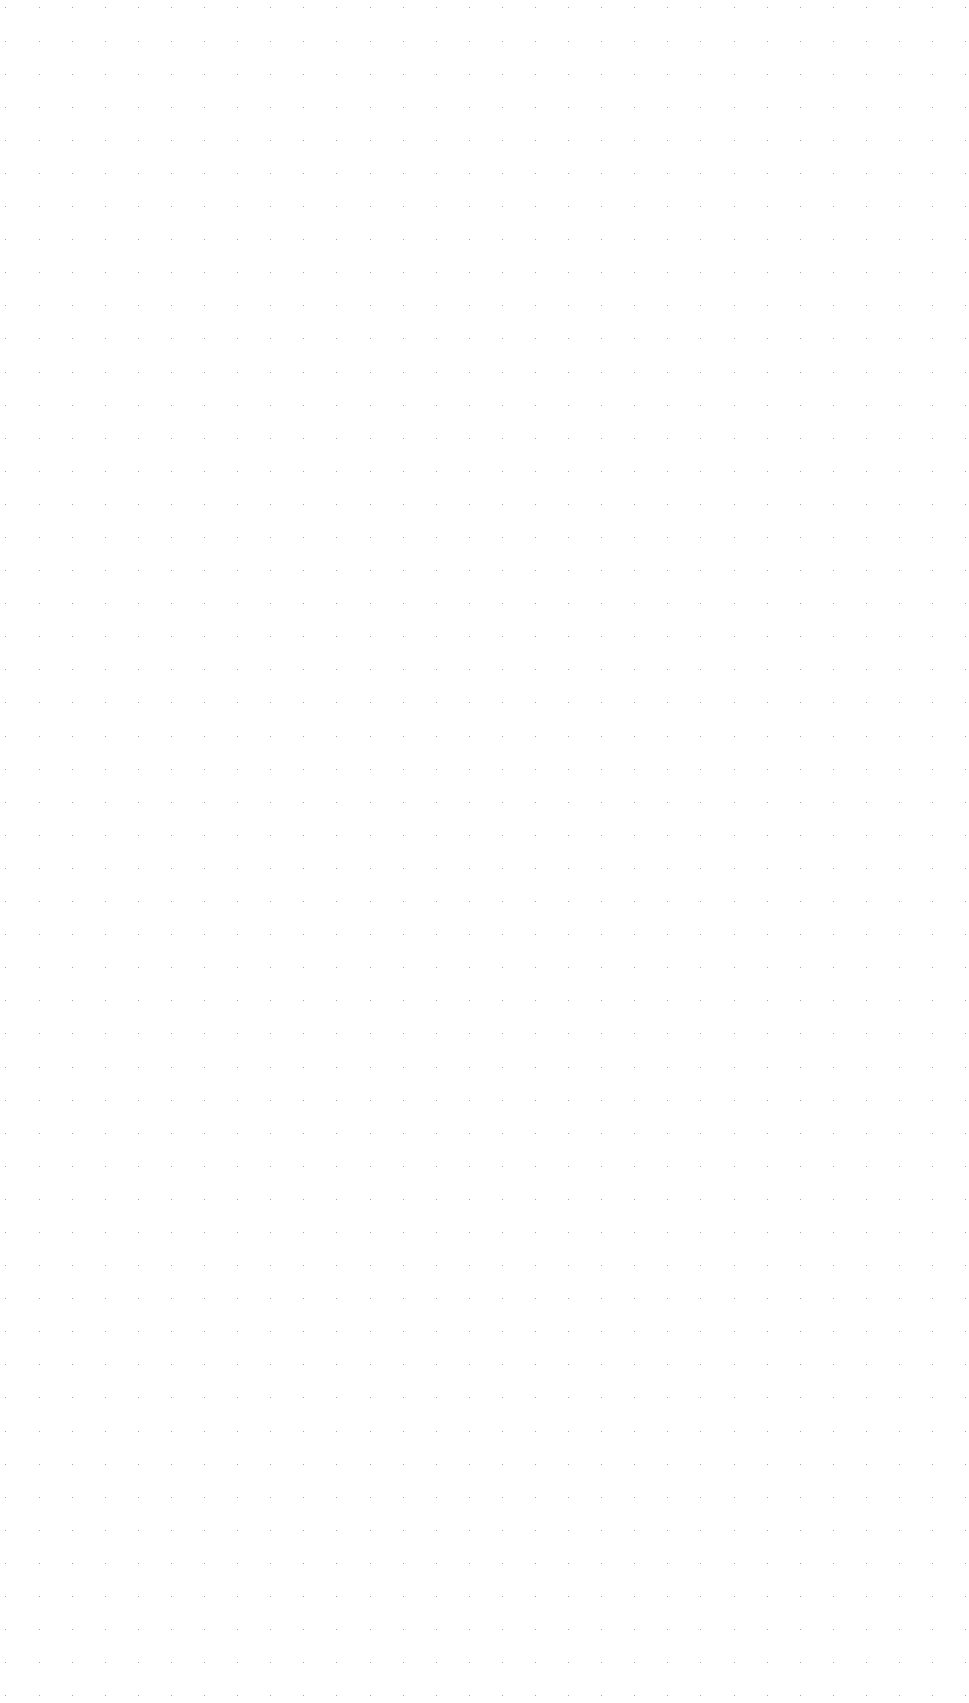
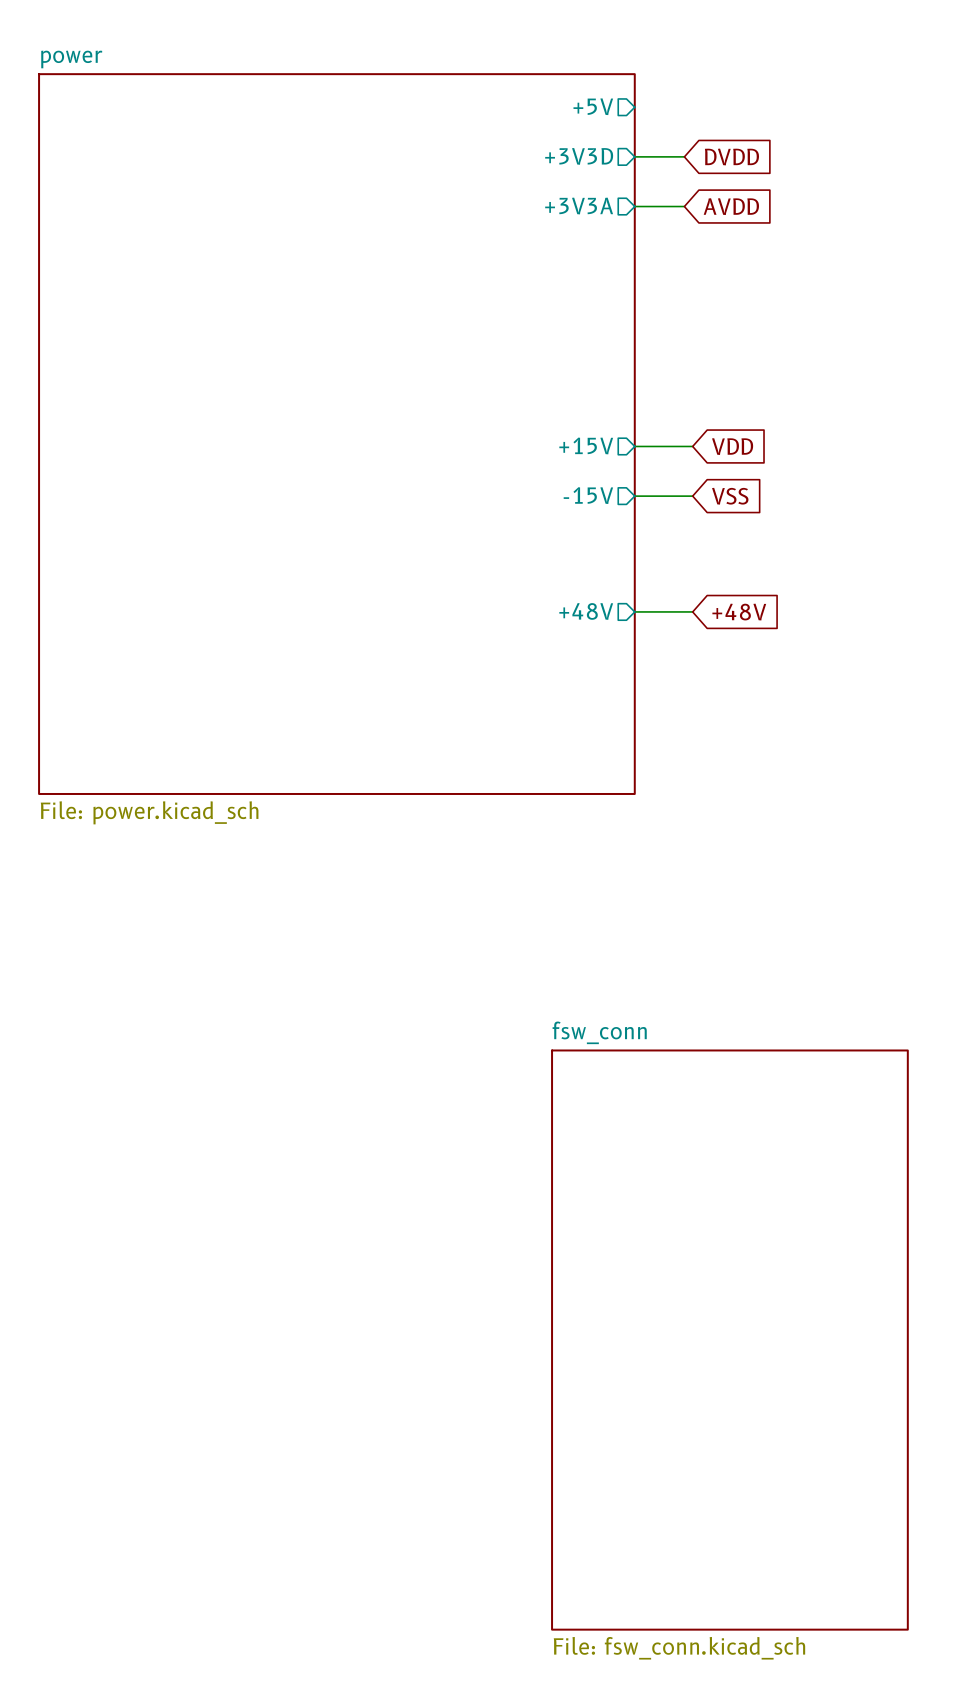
sheet pin: none -> +5V (593, 106)
sheet pin: none -> +3V3D (579, 156)
wire: none -> (634, 156) (684, 156)
global label: none -> DVDD (731, 156)
sheet pin: none -> +3V3A (579, 206)
wire: none -> (634, 206) (684, 206)
global label: none -> AVDD (731, 206)
sheet power: none -> File: power.kicad_sch (336, 434)
sheet pin: none -> +15V (586, 445)
wire: none -> (634, 446) (692, 446)
global label: none -> VDD (732, 446)
sheet pin: none -> -15V (588, 495)
wire: none -> (634, 496) (692, 496)
global label: none -> VSS (730, 496)
sheet pin: none -> +48V (586, 611)
wire: none -> (634, 611) (692, 611)
global label: none -> +48V (739, 612)
sheet fsw_conn: none -> File: fsw_conn.kicad_sch (729, 1340)

